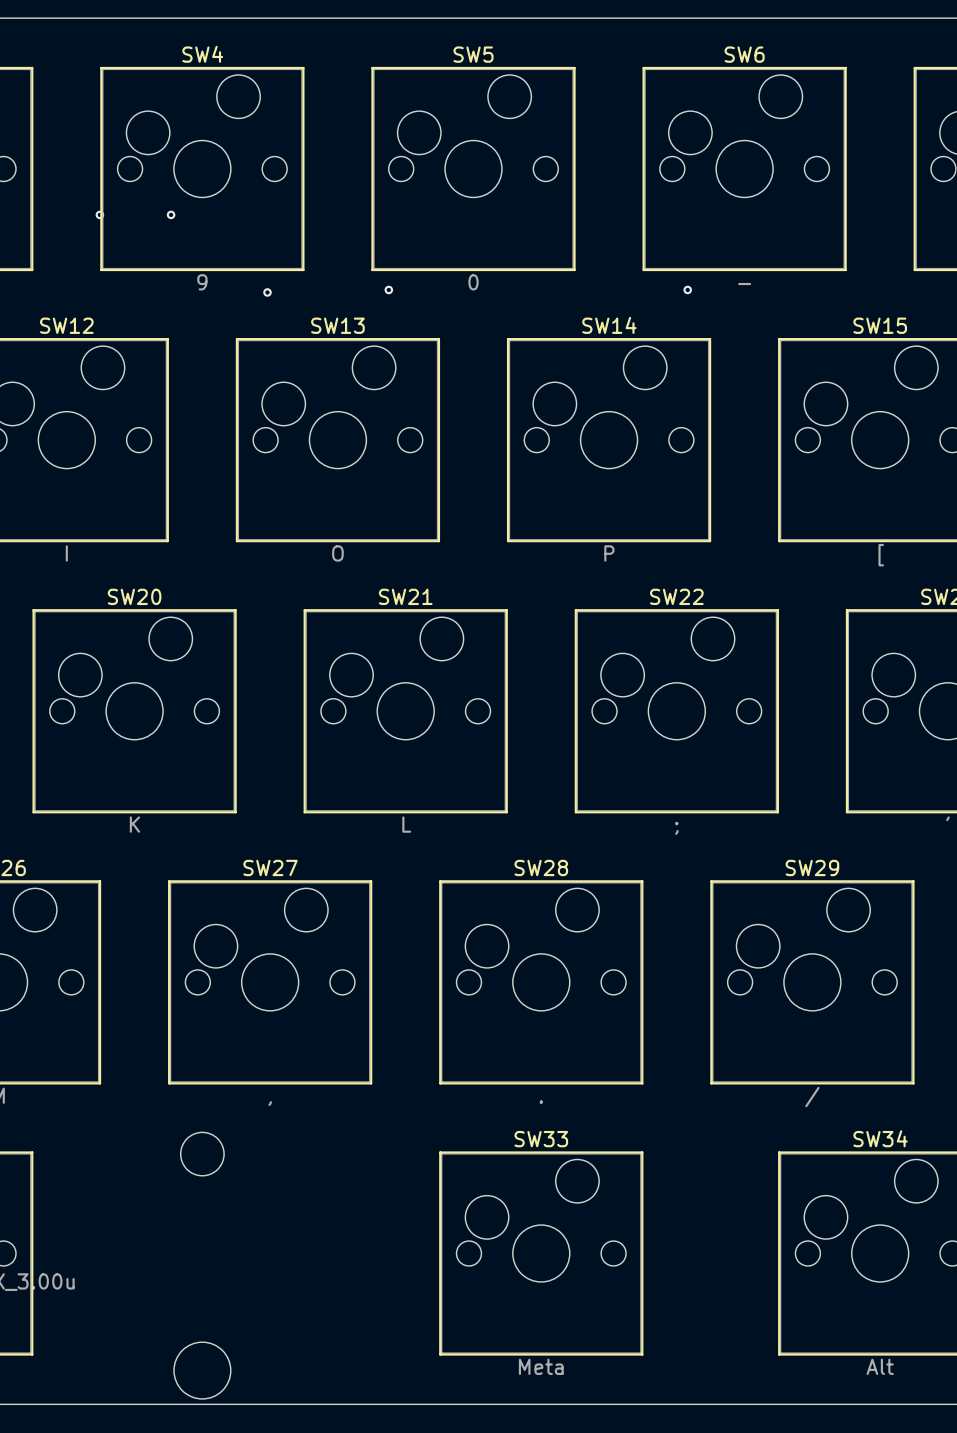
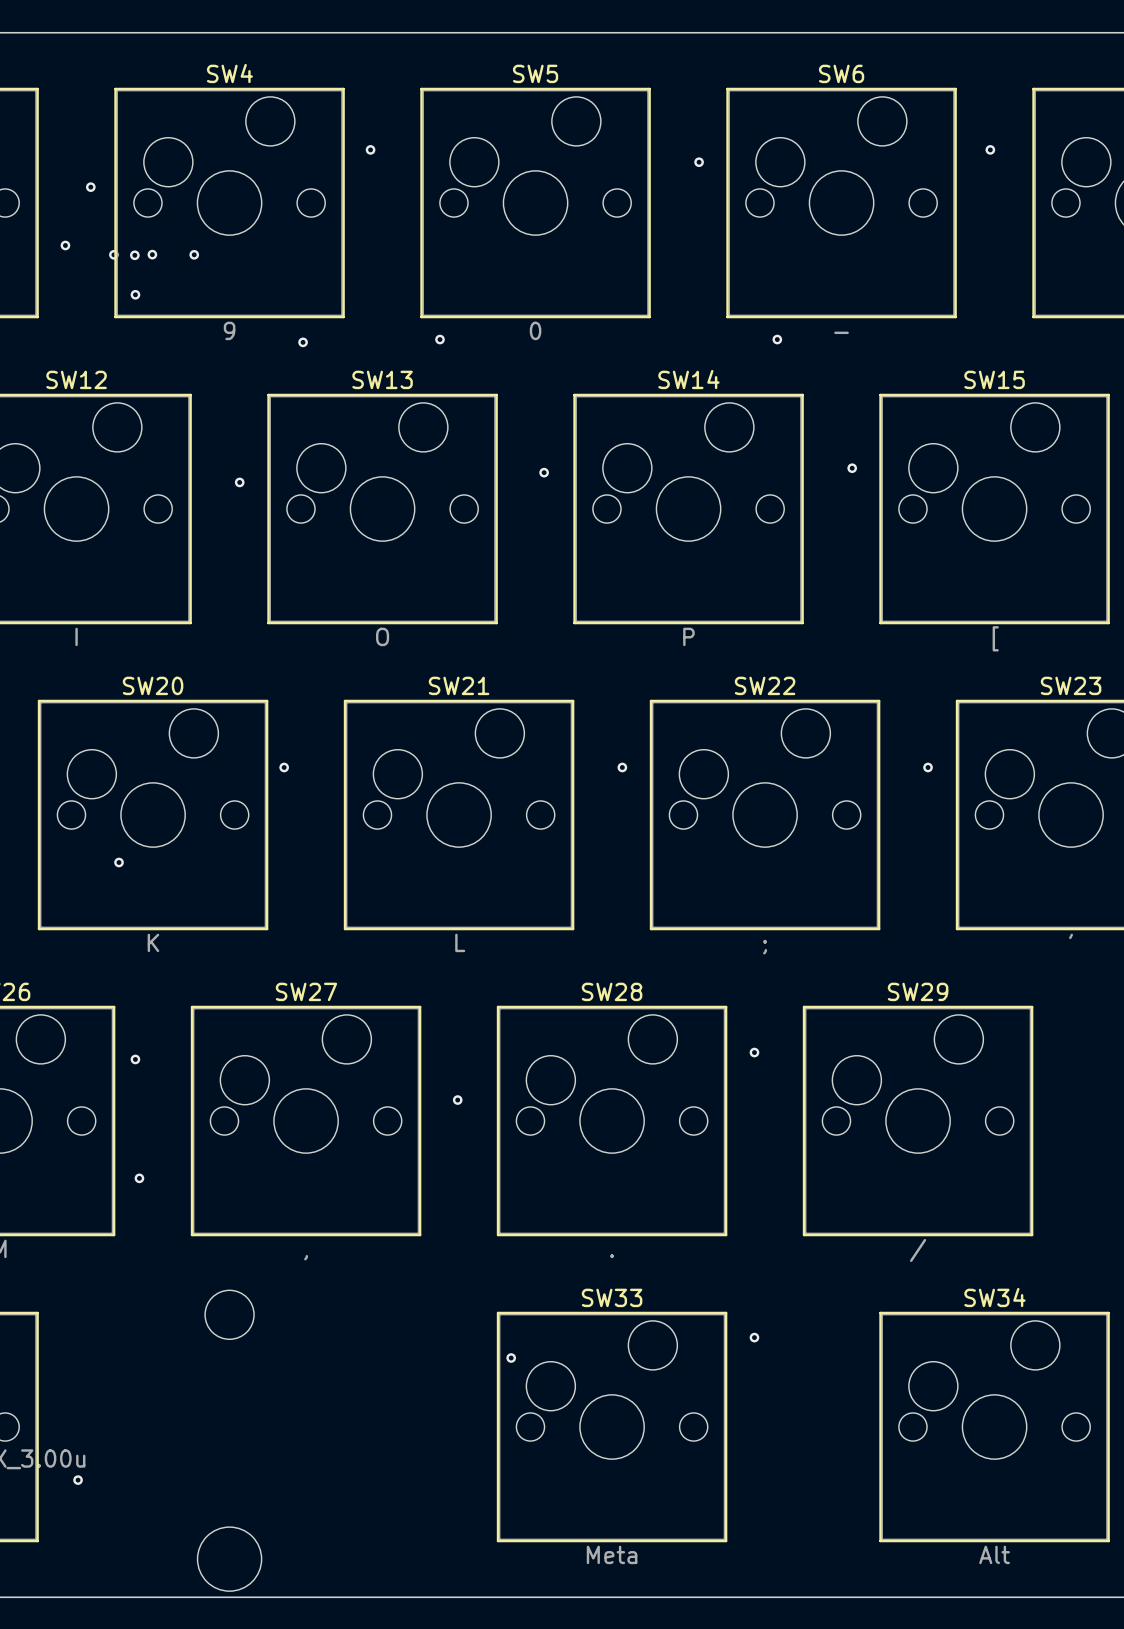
via: none -> (370, 149)
via: none -> (990, 149)
via: none -> (699, 162)
via: none -> (90, 187)
via: none -> (65, 245)
via: none -> (152, 254)
via: none -> (134, 255)
via: none -> (135, 294)
via: none -> (852, 468)
via: none -> (544, 472)
via: none -> (239, 482)
via: none -> (284, 767)
via: none -> (622, 767)
via: none -> (928, 767)
via: none -> (119, 862)
via: none -> (754, 1052)
via: none -> (135, 1059)
via: none -> (457, 1100)
via: none -> (139, 1178)
via: none -> (754, 1337)
via: none -> (511, 1358)
via: none -> (78, 1480)

